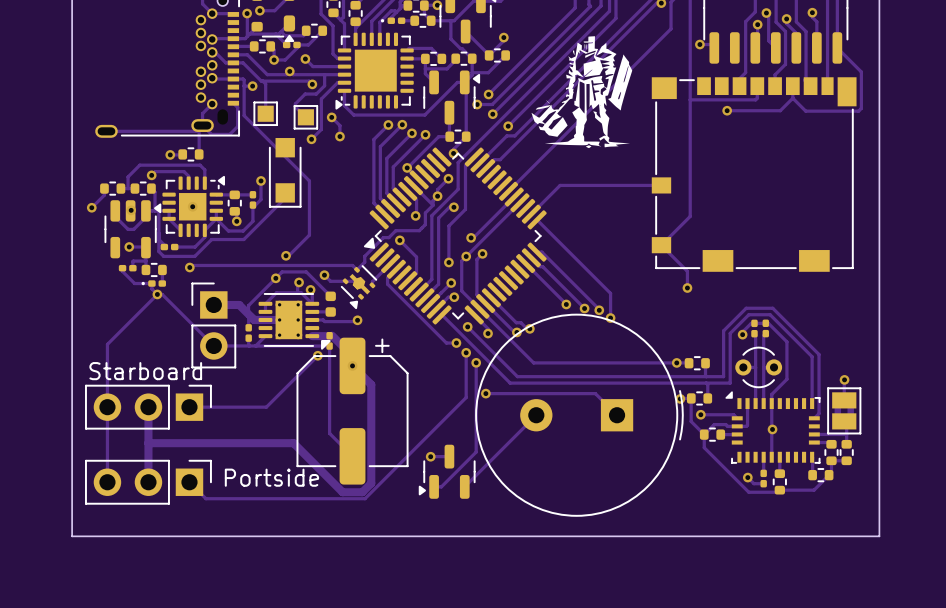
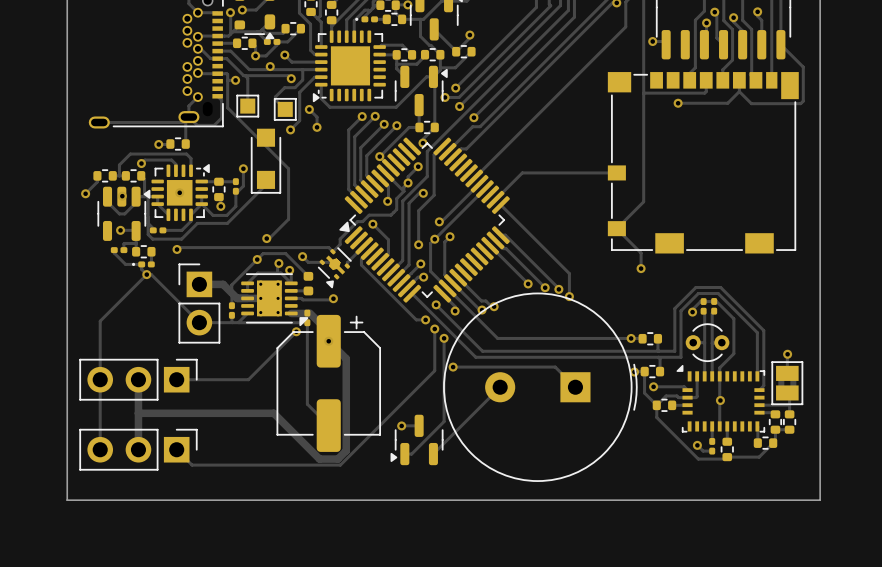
drawing: [531, 36, 633, 149] -> none
text: Starboard (145, 371) -> none
text: Portside (271, 477) -> none

